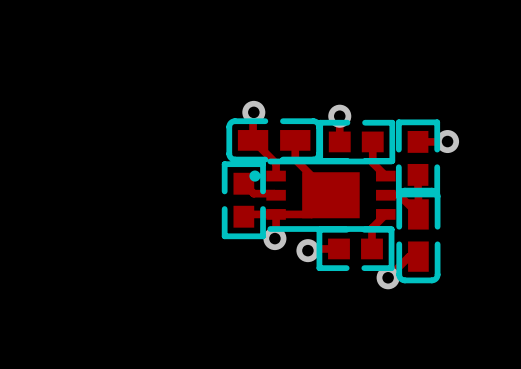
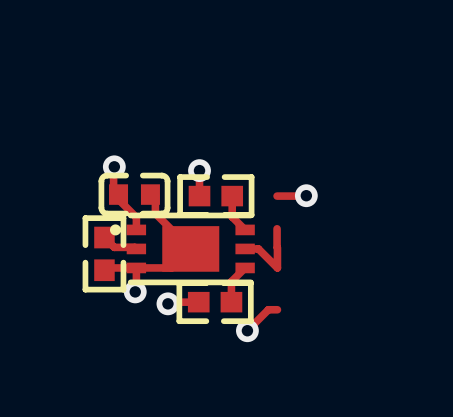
part footprint: [226, 118, 322, 163] -> [98, 172, 171, 217]
part: (418, 158) -> none
part: (418, 235) -> none

